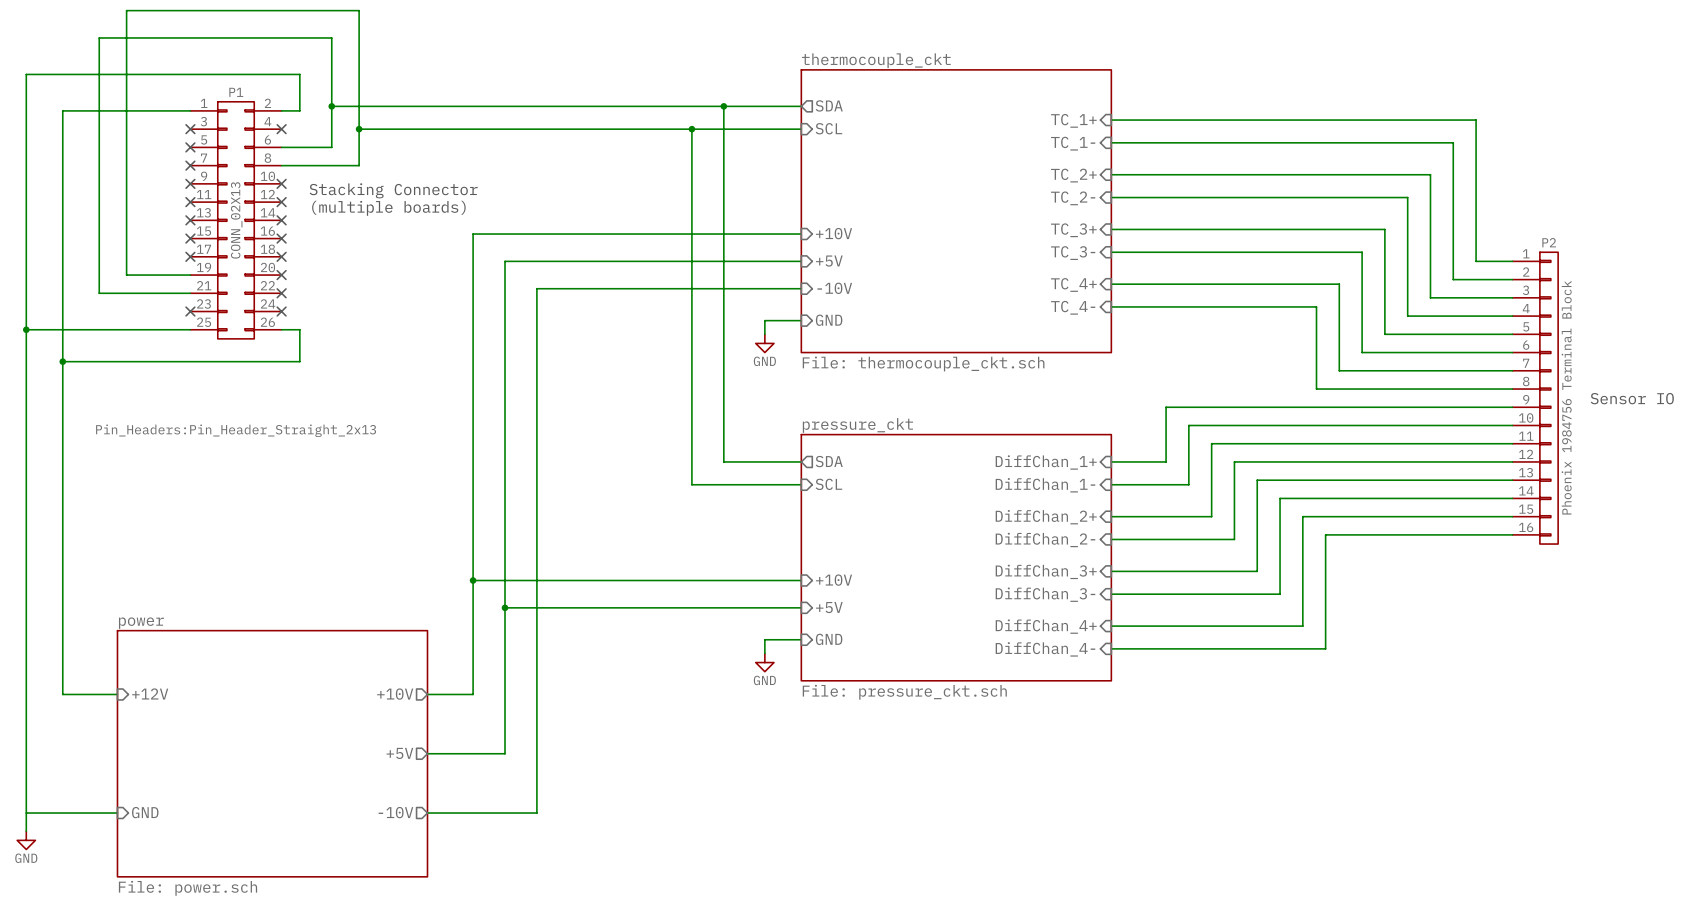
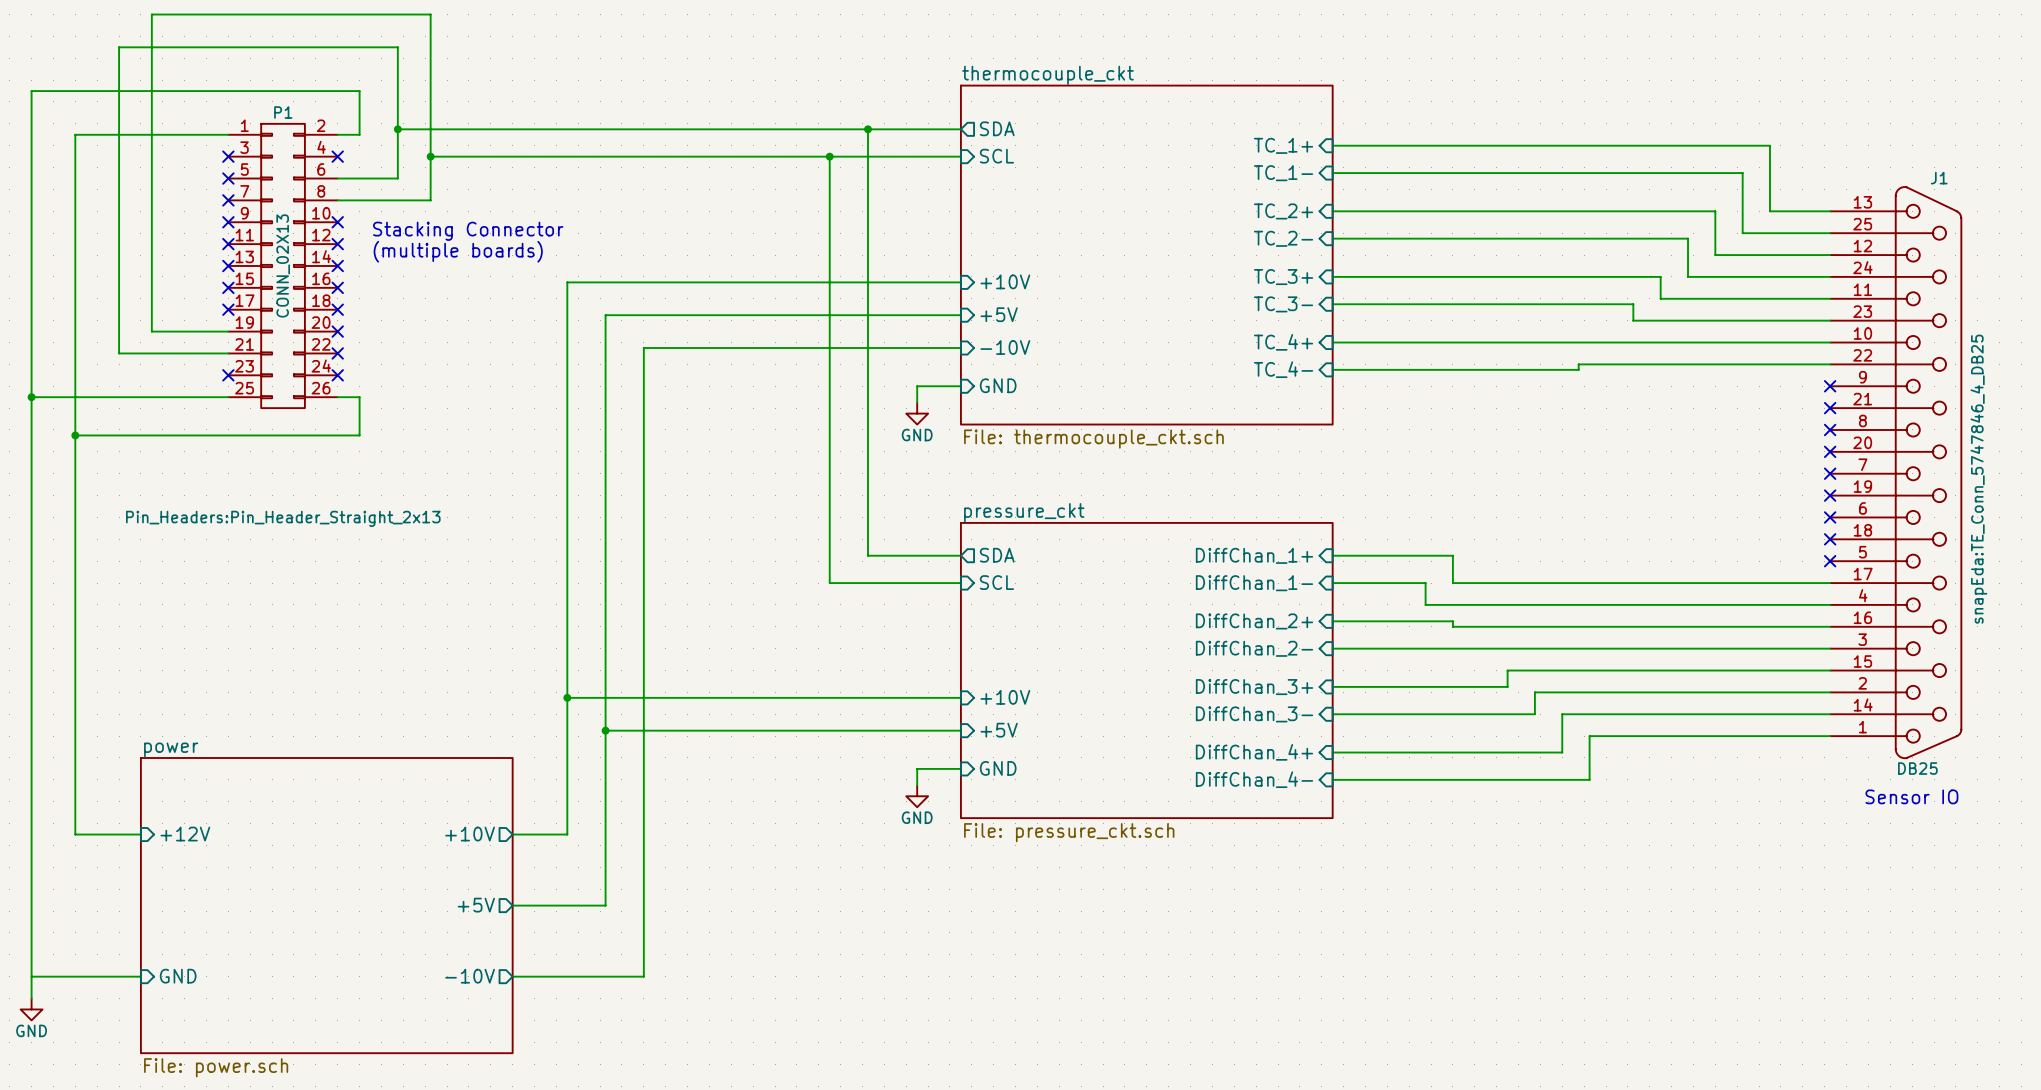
wire: (1476, 174) (1476, 261) (1512, 261) -> (1770, 211) (1830, 211)
wire: (1453, 192) (1453, 279) (1512, 279) -> (1742, 233) (1830, 233)
wire: (1430, 211) (1430, 297) (1512, 297) -> (1715, 255) (1830, 255)
wire: (1407, 229) (1407, 316) (1512, 316) -> (1688, 276) (1830, 276)
wire: (1384, 247) (1384, 334) (1512, 334) -> (1660, 298) (1830, 298)
wire: (1362, 265) (1362, 352) (1512, 352) -> (1633, 320) (1830, 320)
wire: (1339, 284) (1339, 370) (1512, 370) -> (1606, 342) (1830, 342)
wire: (1316, 306) (1316, 389) (1512, 389) -> (1578, 369) (1578, 364) (1830, 364)
no-connect mark: none -> (1830, 386)
no-connect mark: none -> (1830, 408)
no-connect mark: none -> (1830, 429)
no-connect mark: none -> (1830, 451)
J1: none -> DB25 (1896, 472)
no-connect mark: none -> (1830, 473)
P2: Phoenix 1984756 Terminal Block (1535, 398) -> none
text: Sensor IO (1632, 398) -> none
wire: (1512, 407) (1166, 407) (1166, 461) -> (1452, 555) (1398, 555)
no-connect mark: none -> (1830, 495)
wire: (1512, 425) (1188, 425) (1188, 484) -> (1830, 604) (1425, 604) (1425, 583)
no-connect mark: none -> (1830, 517)
wire: (1512, 443) (1211, 443) (1211, 461) -> none
no-connect mark: none -> (1830, 539)
wire: (1512, 461) (1234, 461) (1234, 539) -> (1830, 648) (1480, 648)
no-connect mark: none -> (1830, 561)
wire: (1512, 480) (1257, 480) (1257, 557) -> (1830, 670) (1507, 670)
wire: (1211, 484) (1211, 516) -> (1452, 583) (1830, 583)
wire: (1512, 498) (1280, 498) (1280, 575) -> (1830, 692) (1534, 692)
wire: none -> (1452, 621) (1452, 626) (1830, 626)
wire: (1512, 516) (1302, 516) (1302, 594) -> (1830, 714) (1562, 714)
wire: (1512, 534) (1325, 534) (1325, 612) -> (1830, 736) (1589, 736)
text: none -> Sensor IO (1911, 796)

